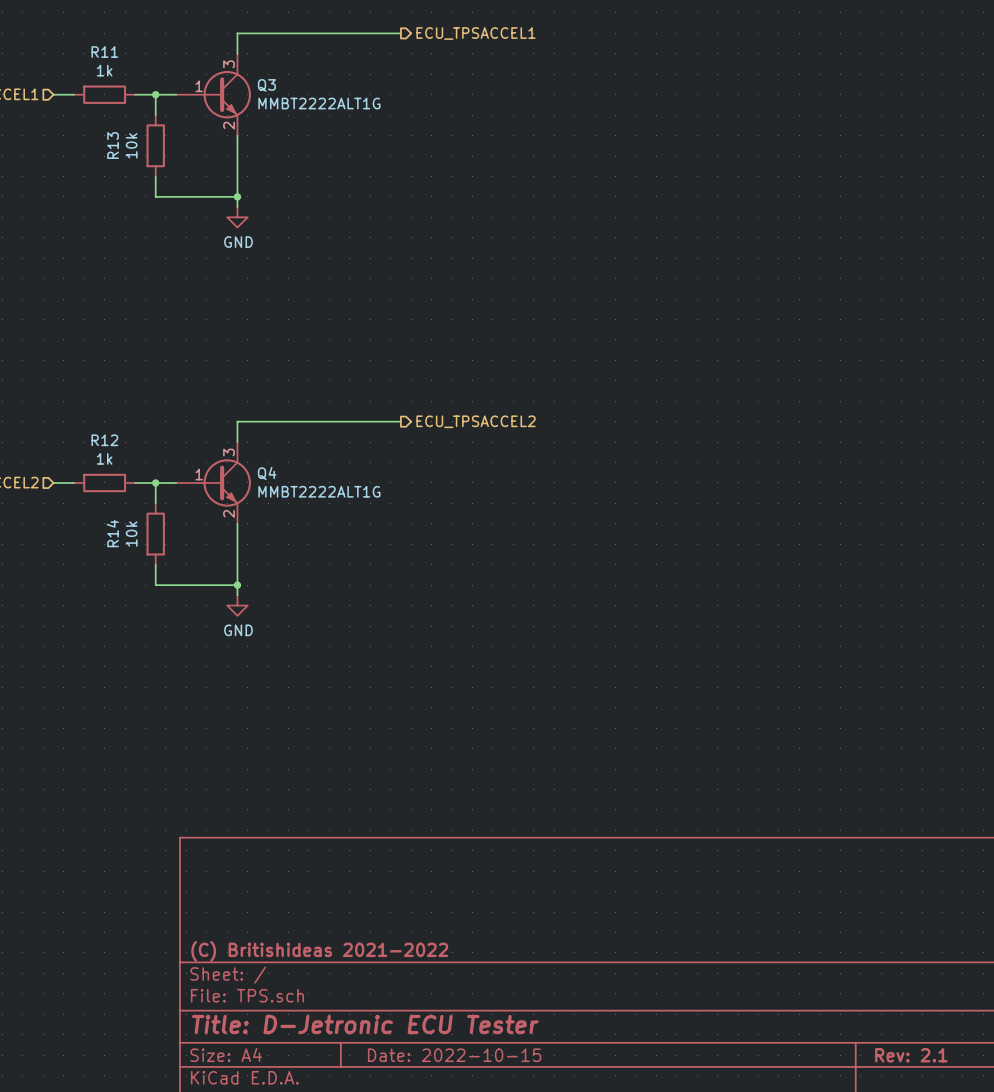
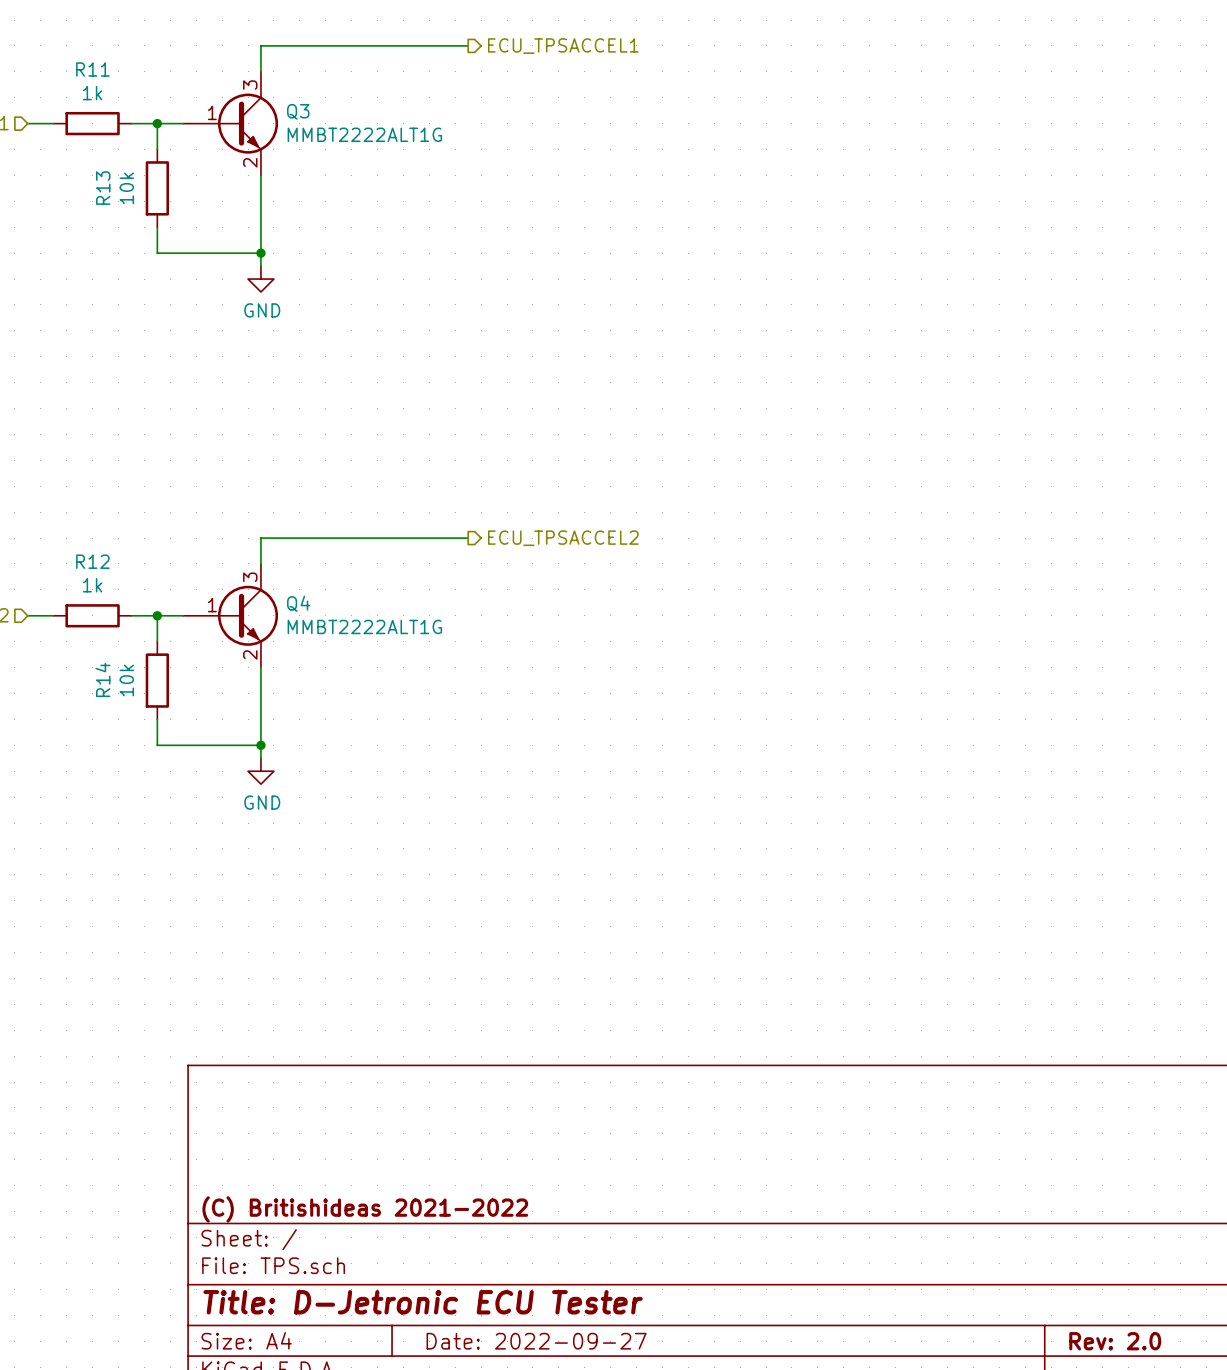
title block: Date: 2022-10-15 (454, 1055) -> Date: 2022-09-27 (536, 1341)
title block: Rev: 2.1 (911, 1055) -> Rev: 2.0 (1115, 1341)

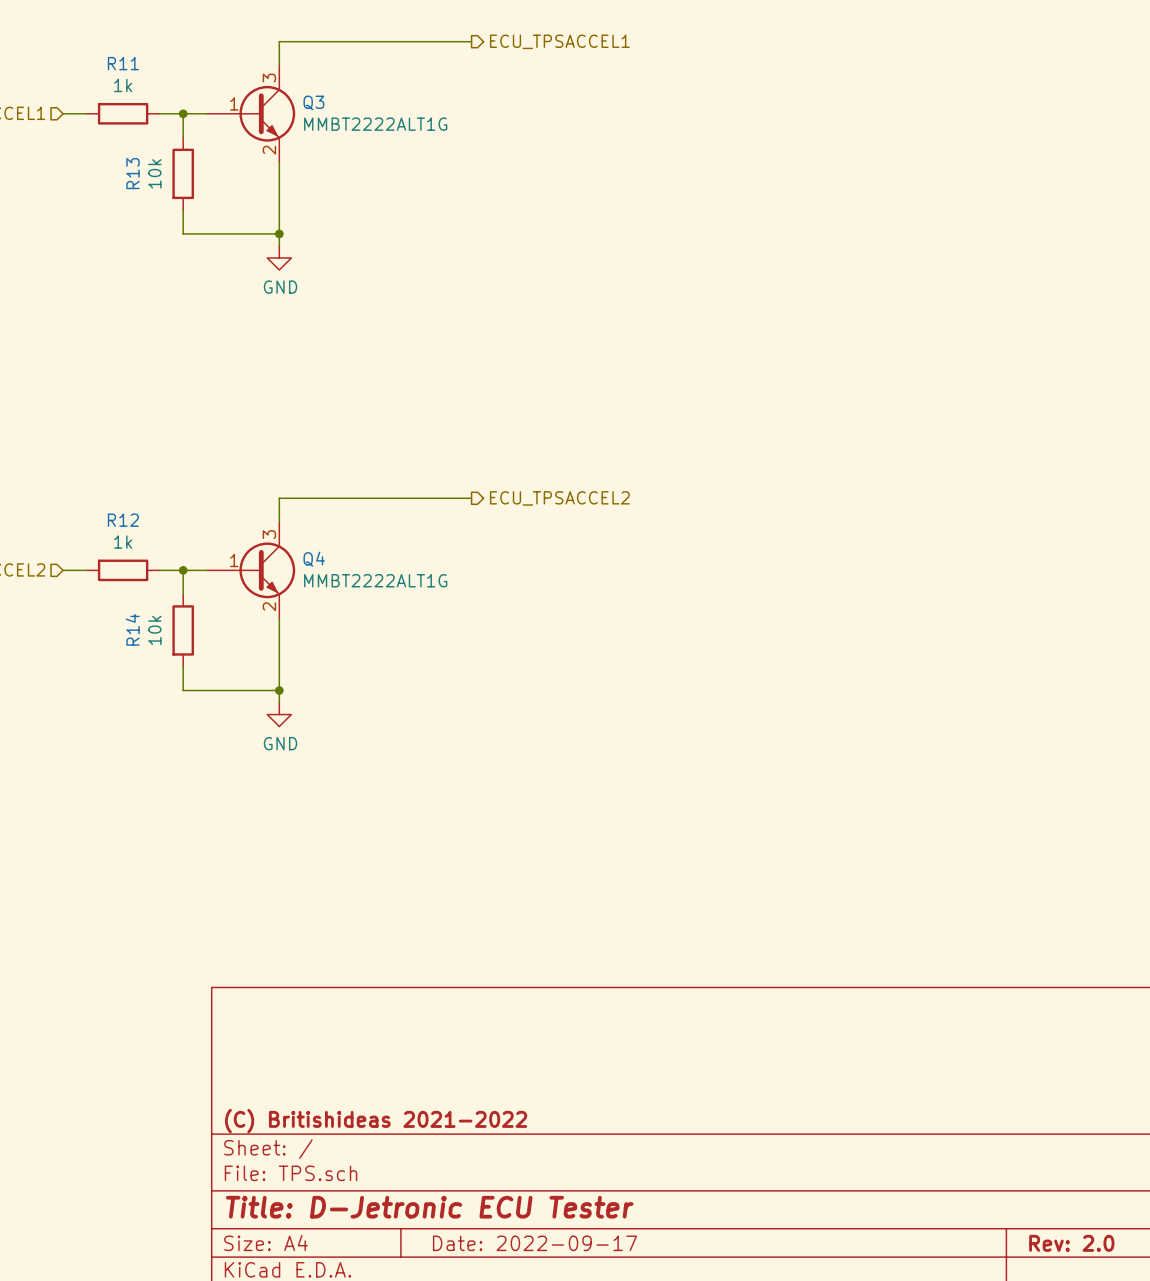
title block: Date: 2022-09-27 (536, 1341) -> Date: 2022-09-17 (534, 1243)

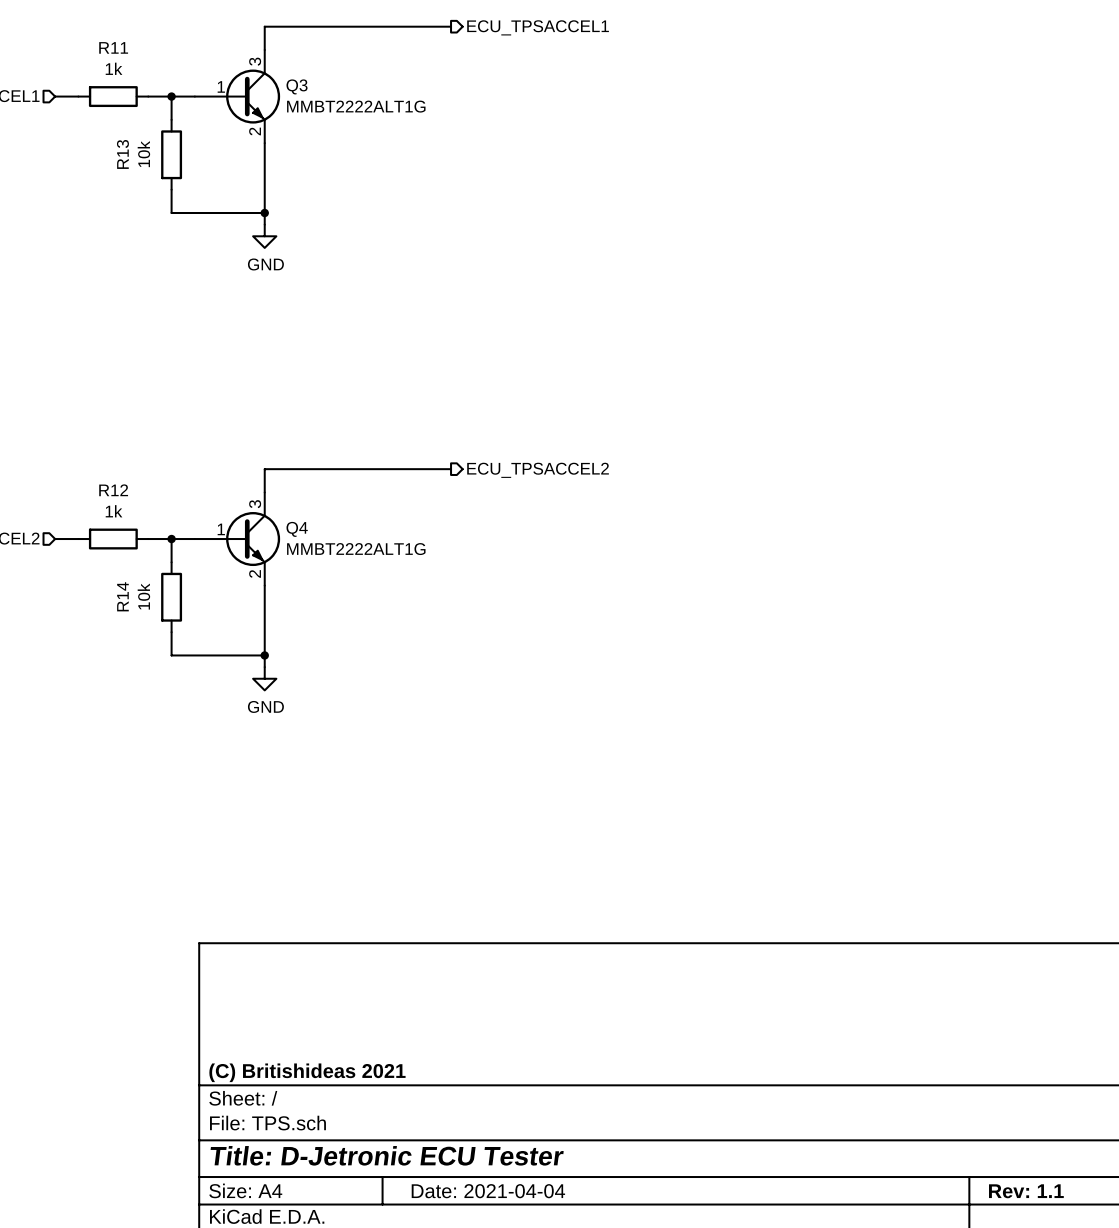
title block: (C) Britishideas 2021-2022 (376, 1121) -> (C) Britishideas 2021 (307, 1072)
title block: Date: 2022-09-17 (534, 1243) -> Date: 2021-04-04 (488, 1191)
title block: Rev: 2.0 (1071, 1243) -> Rev: 1.1 (1026, 1191)

